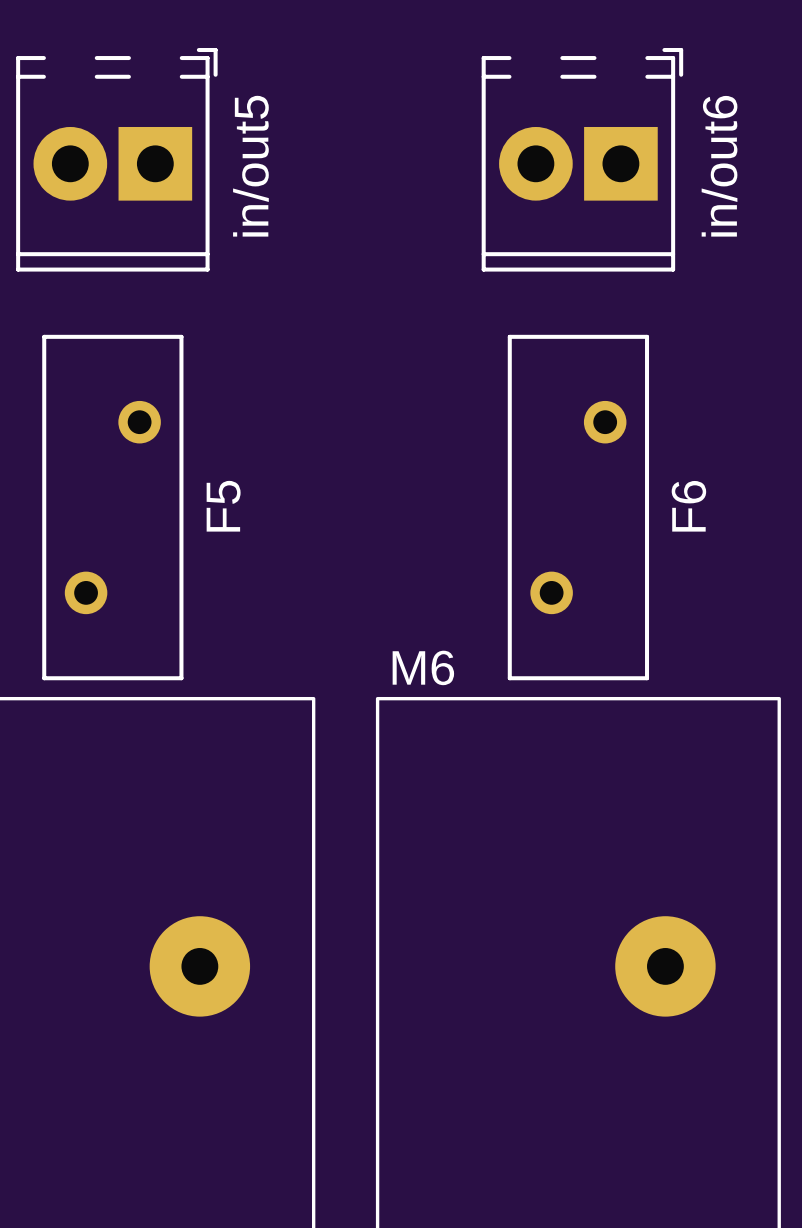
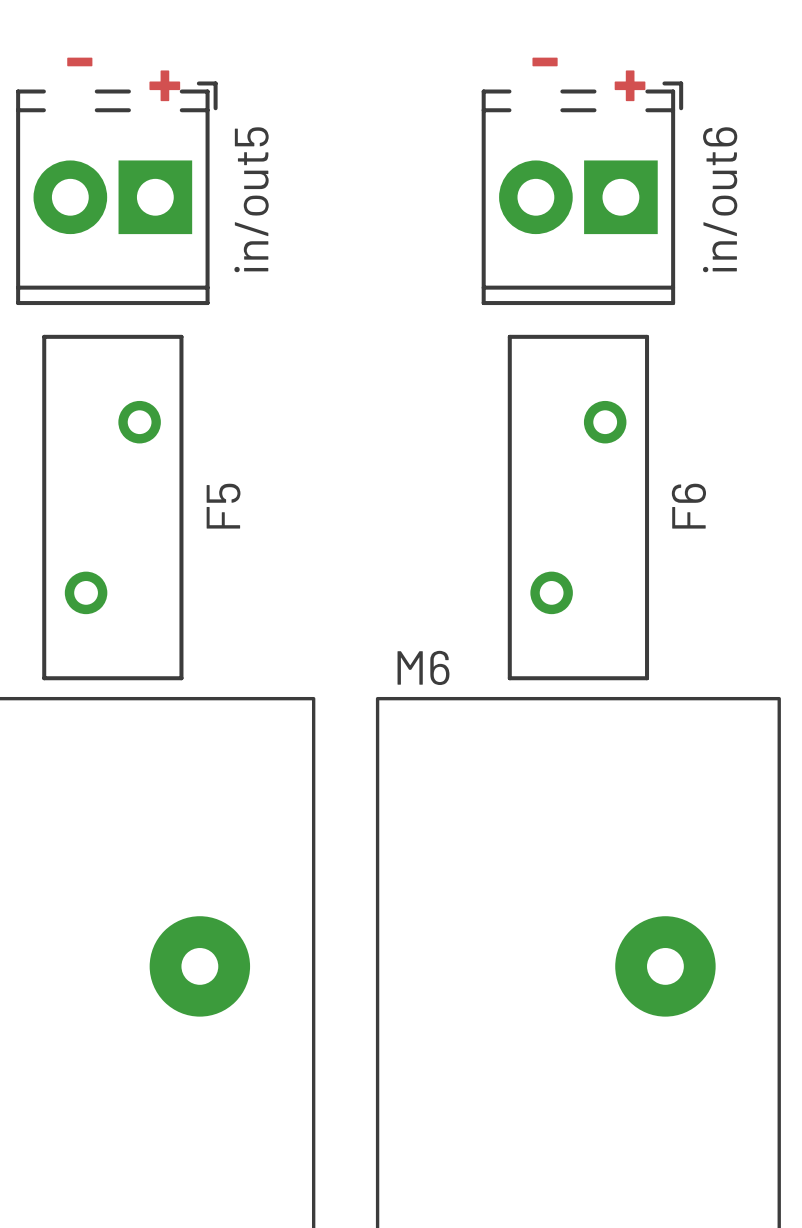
text: none -> - (79, 61)
text: none -> - (545, 61)
text: none -> + (164, 85)
text: none -> + (630, 85)
in/out5 position: (116, 159) -> (116, 193)
in/out6 position: (582, 159) -> (582, 193)

